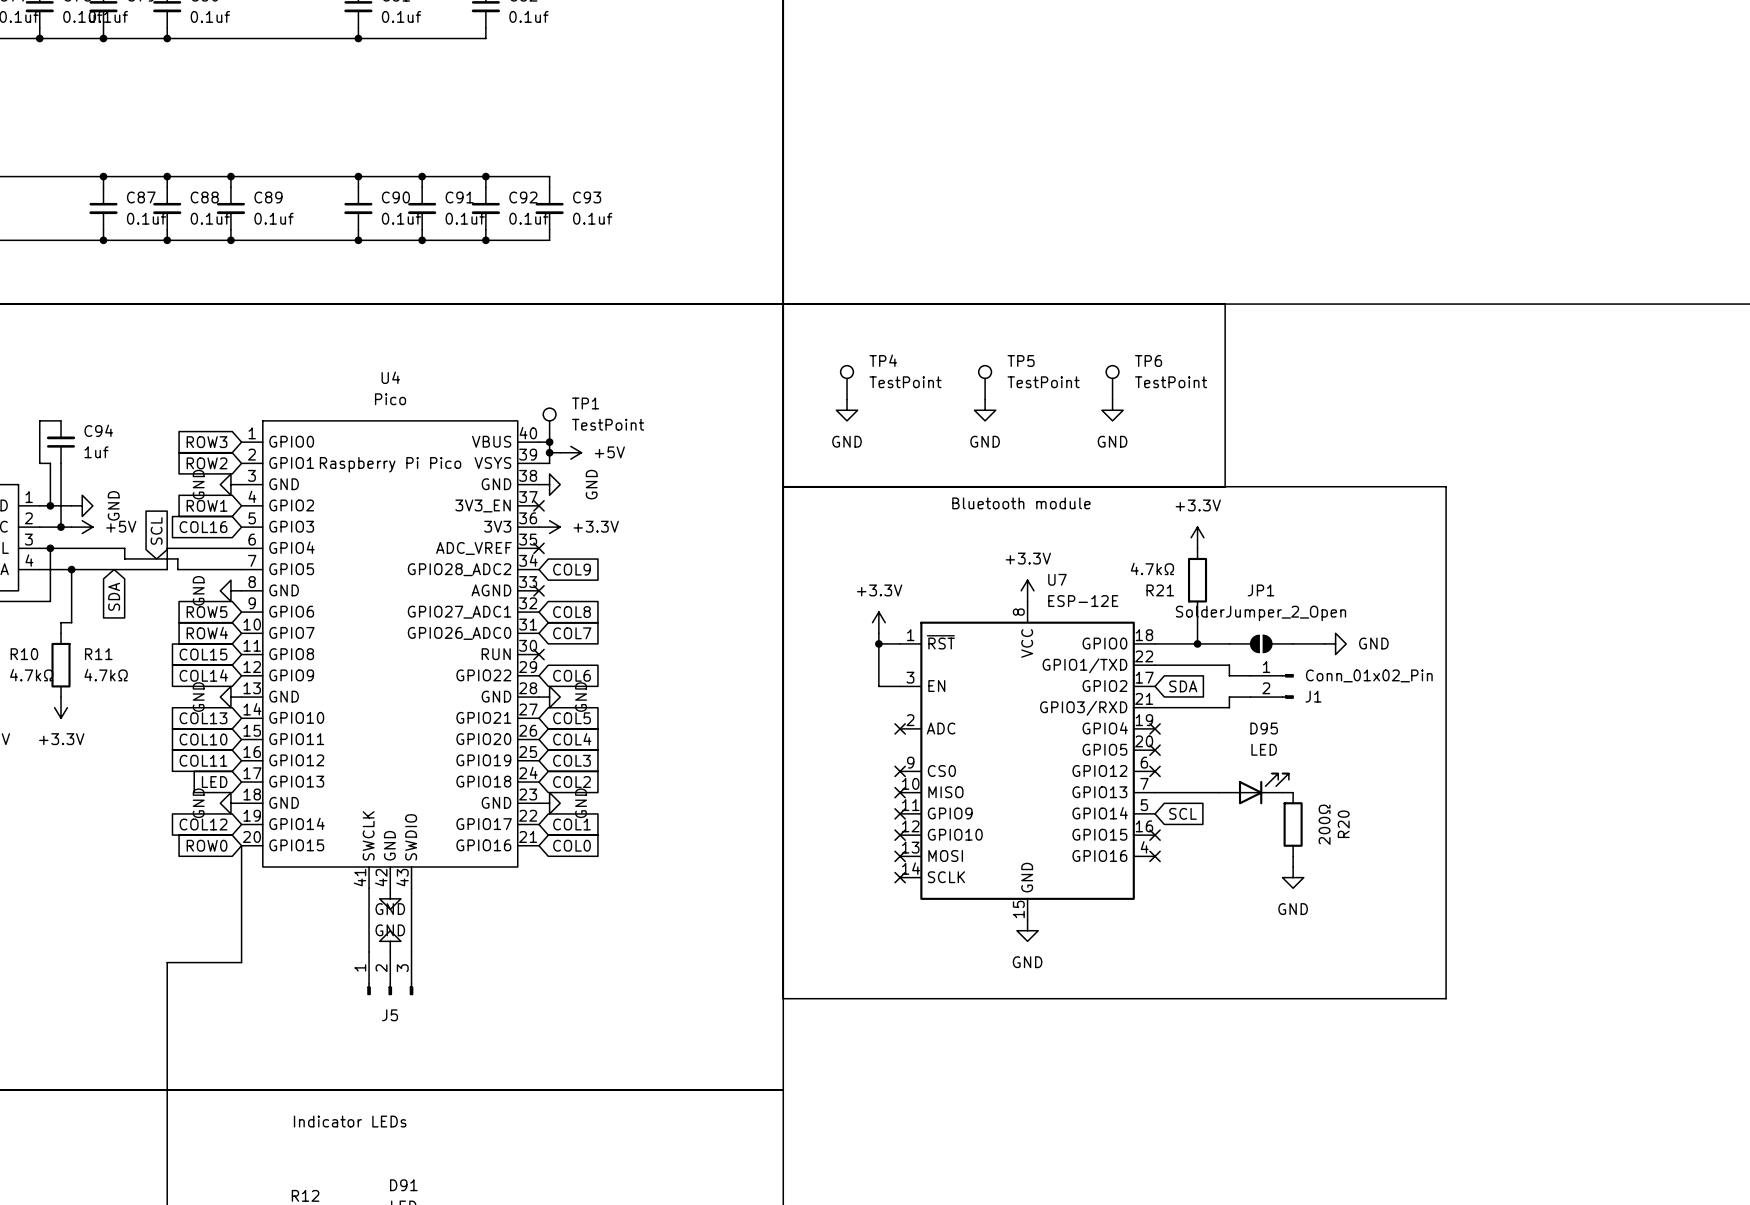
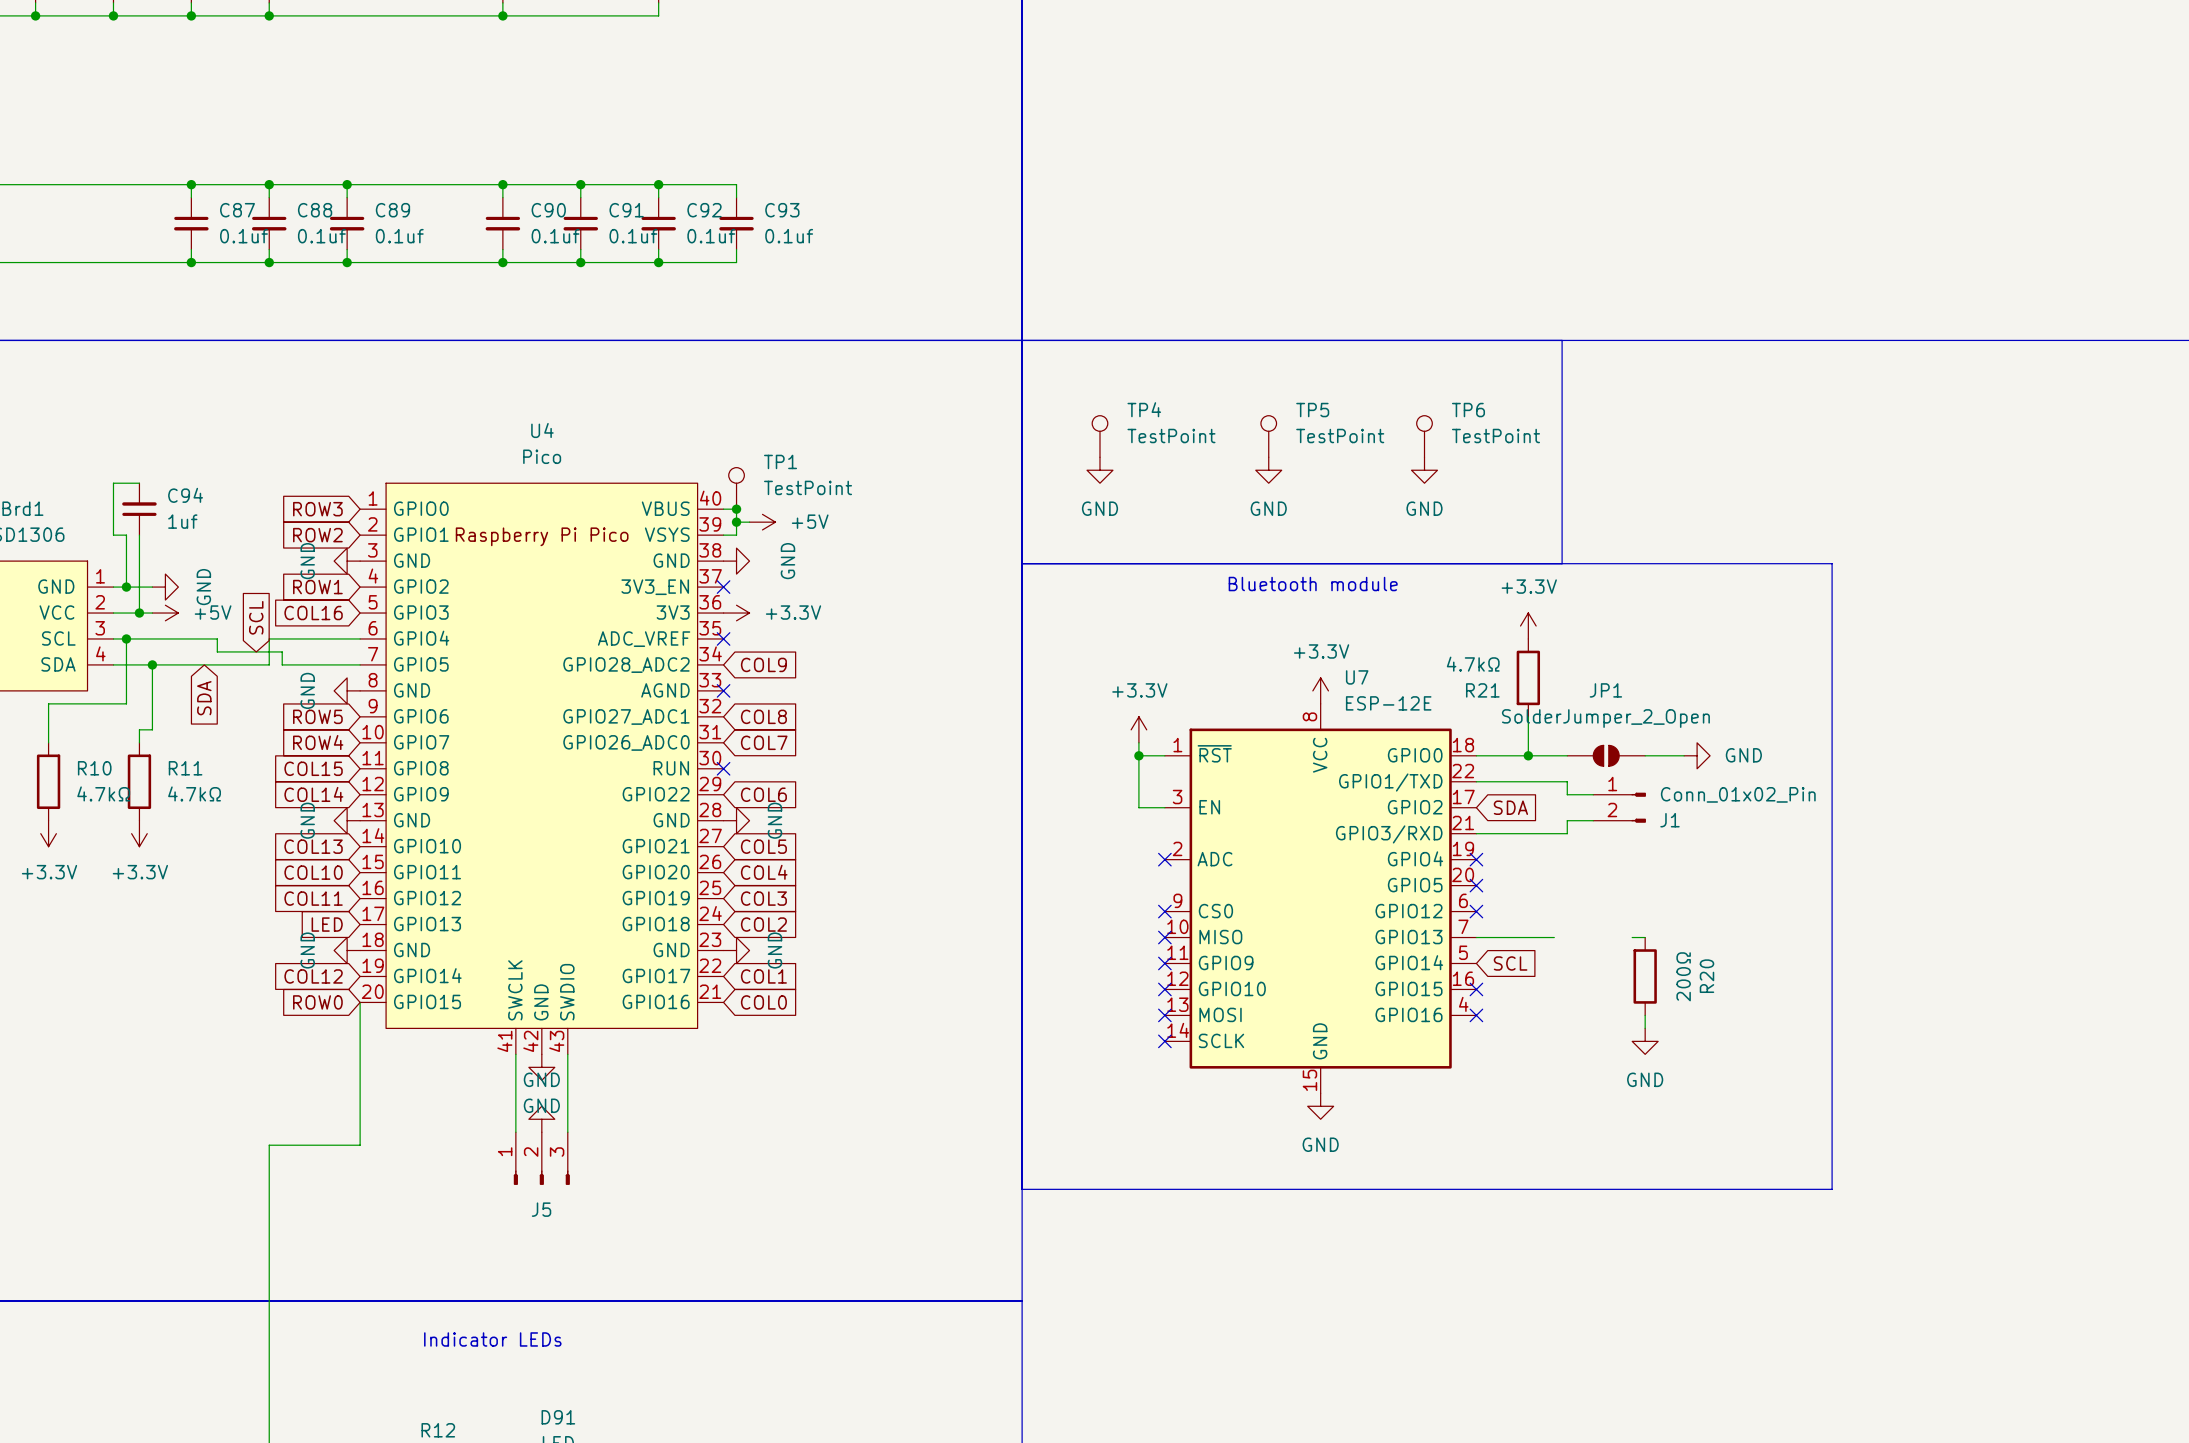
D95: LED (1253, 788) -> none

